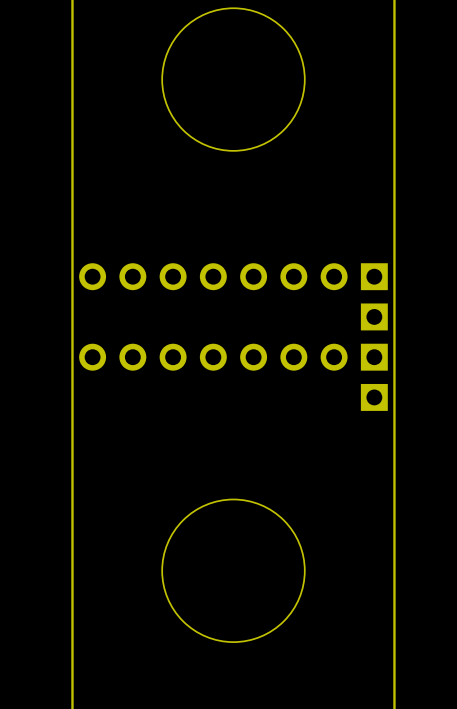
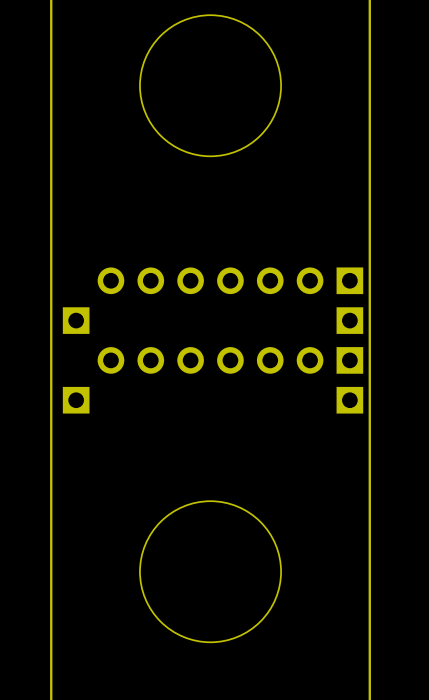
part: (233, 276) -> none
part: none -> (76, 320)
part: (233, 357) -> none
part: none -> (76, 400)

